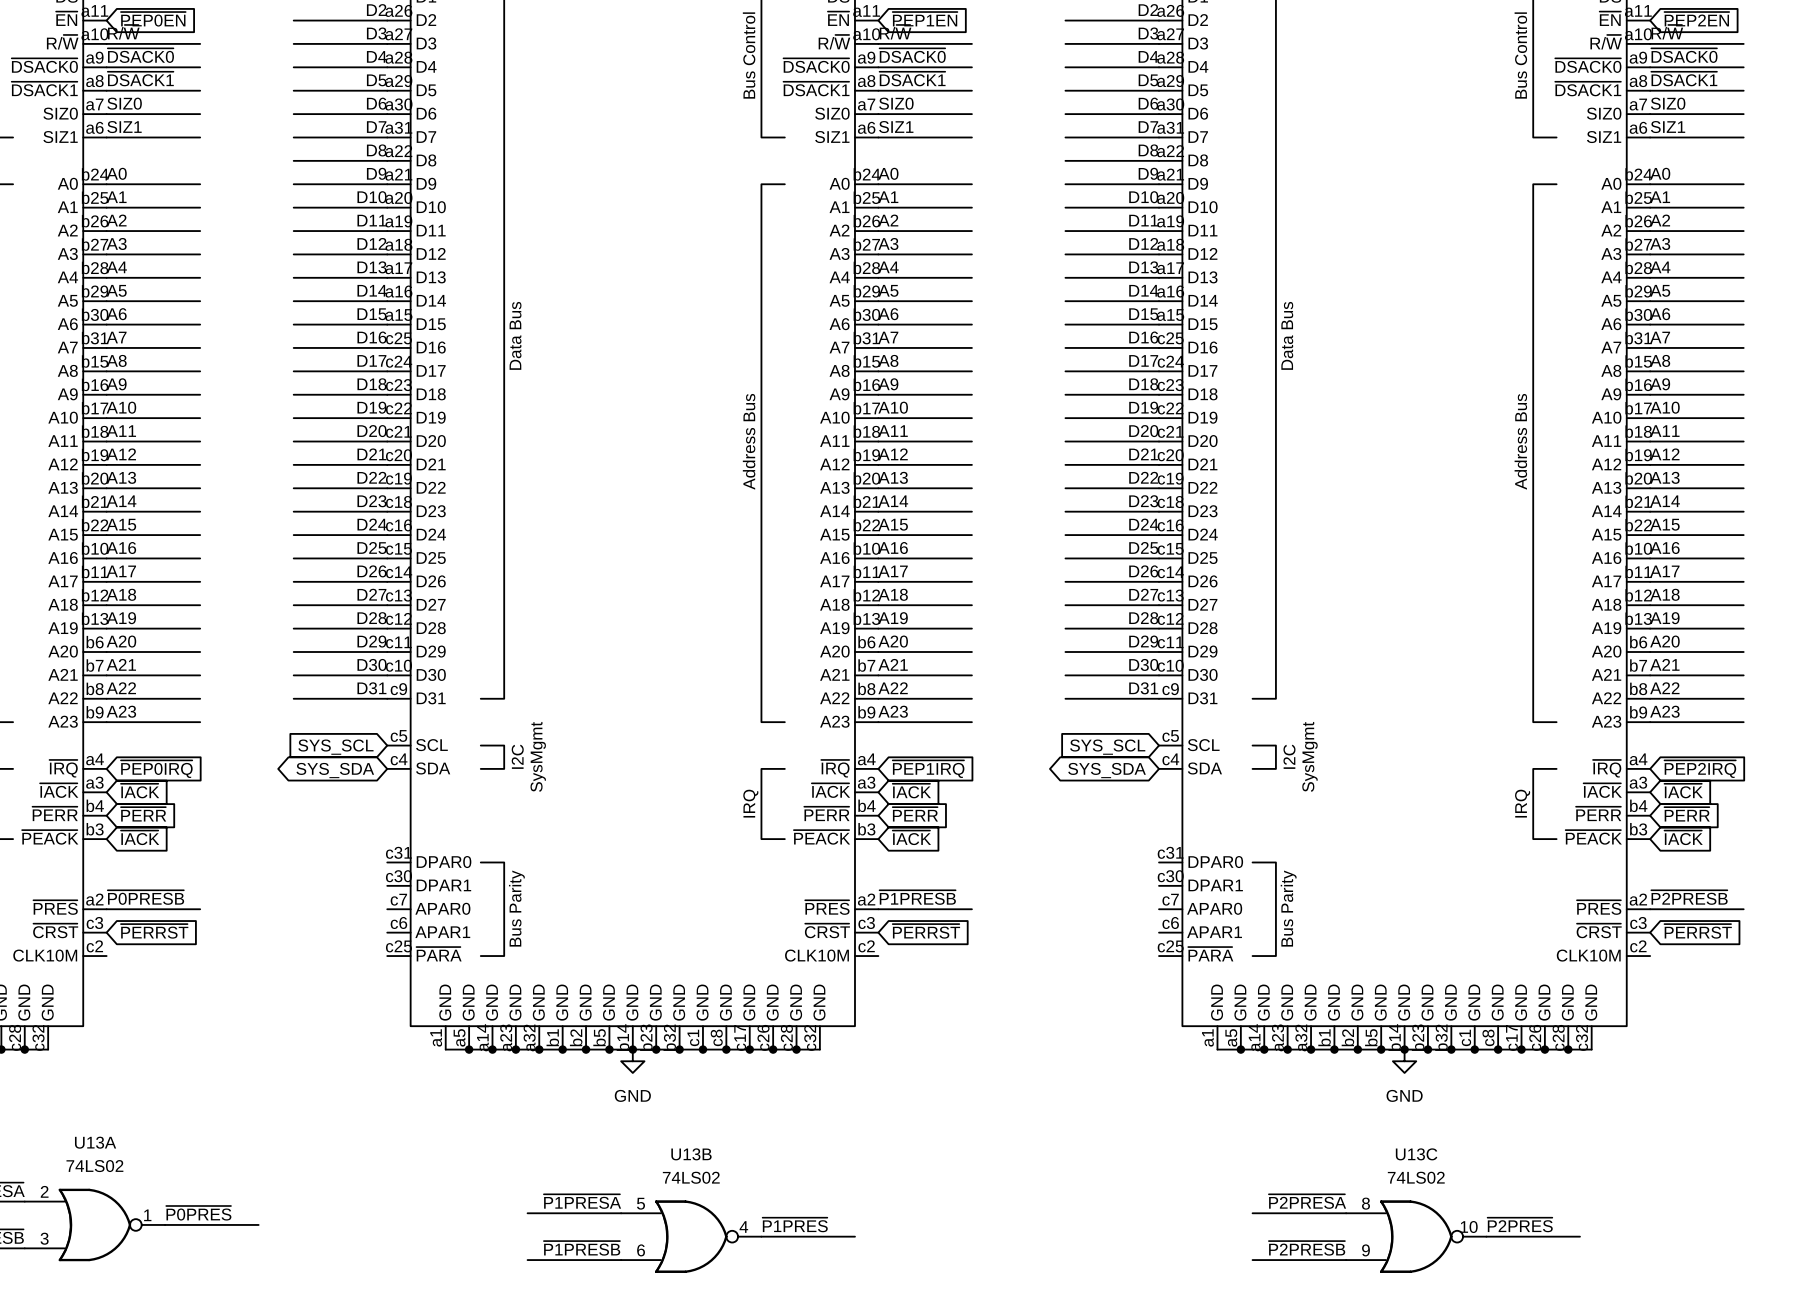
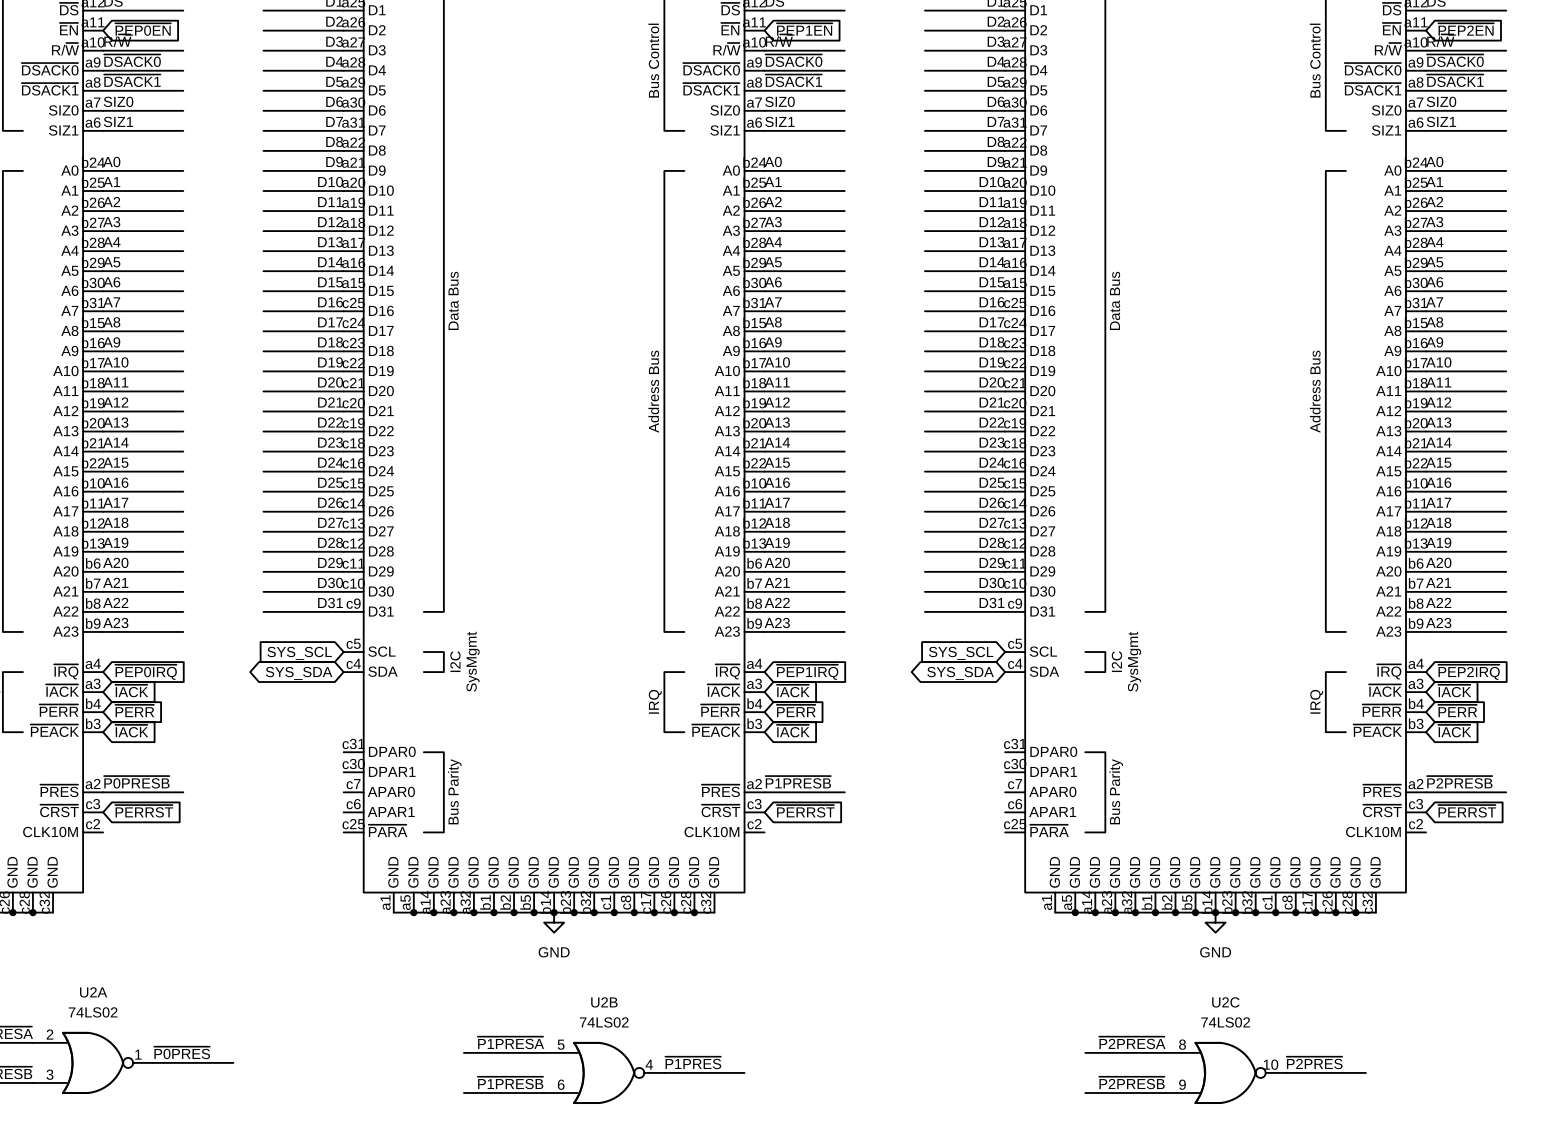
U13A name: U13A (95, 1142) -> U2A (93, 992)
U13B name: U13B (691, 1154) -> U2B (604, 1002)
U13C name: U13C (1416, 1154) -> U2C (1225, 1002)

